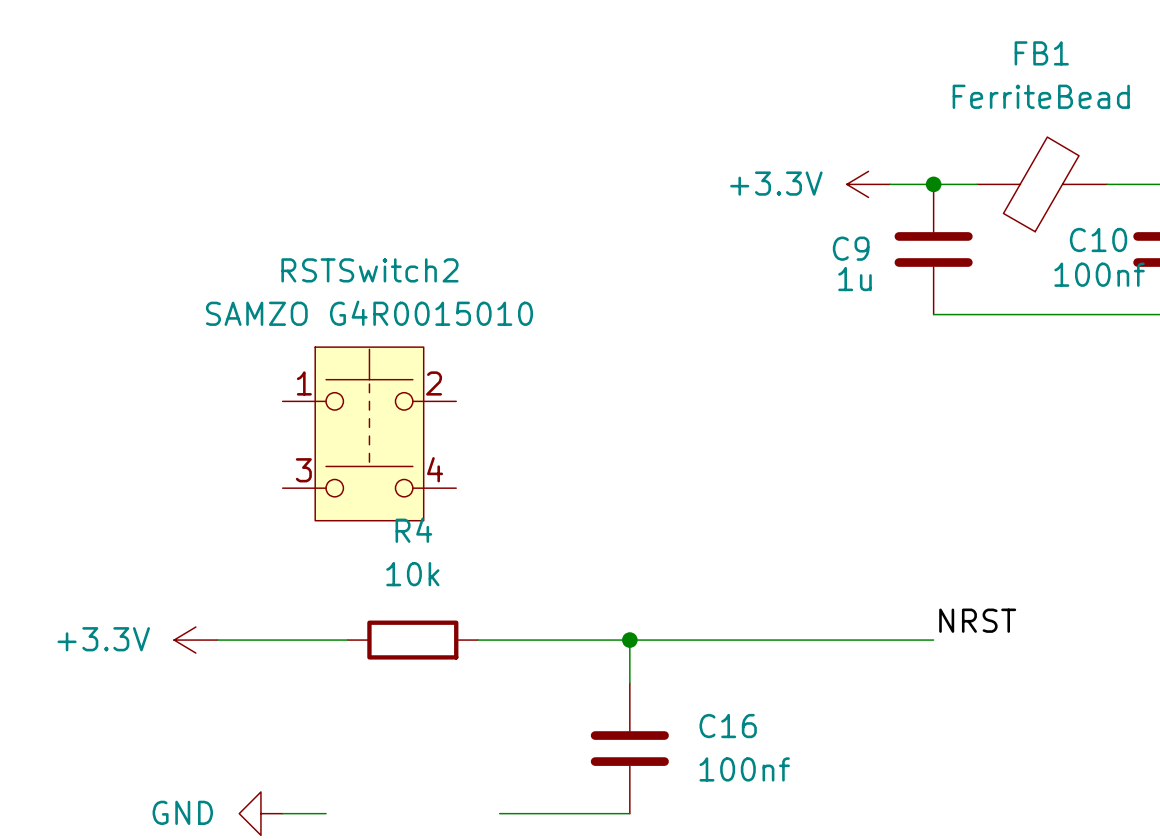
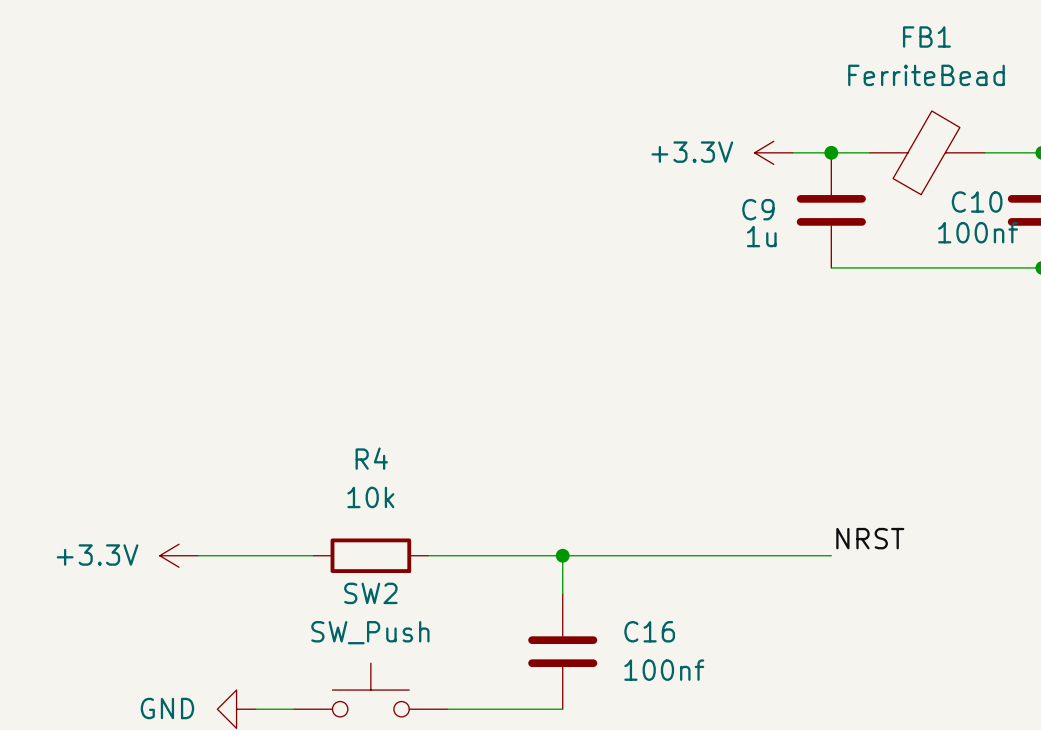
RSTSwitch2: SAMZO G4R0015010 (369, 433) -> none
SW2: none -> SW_Push (370, 690)

